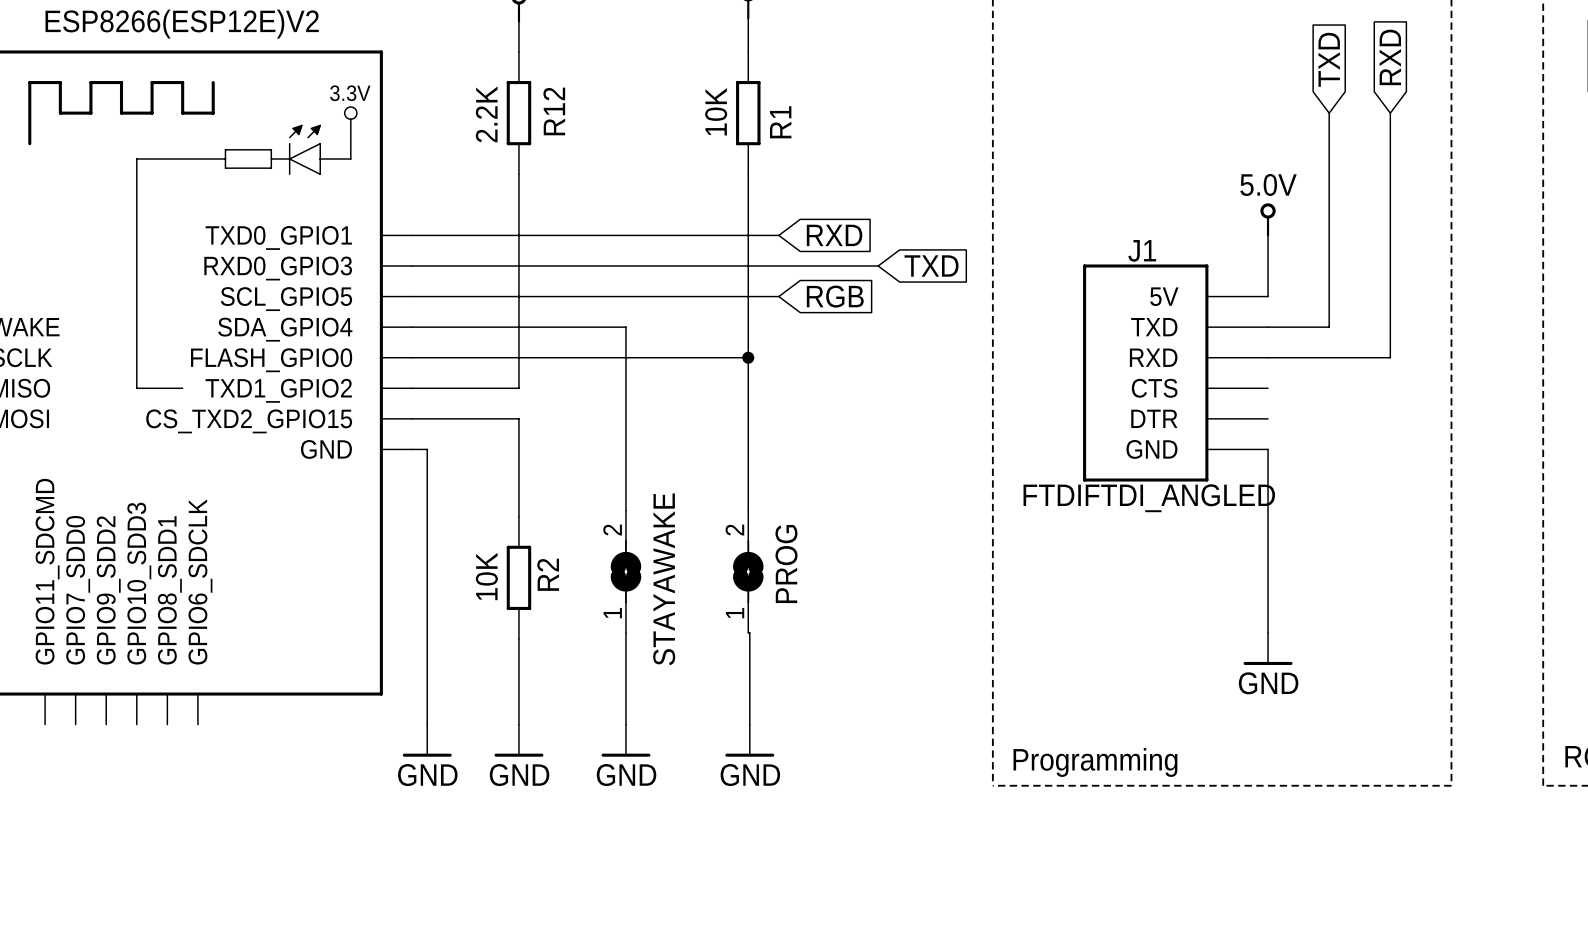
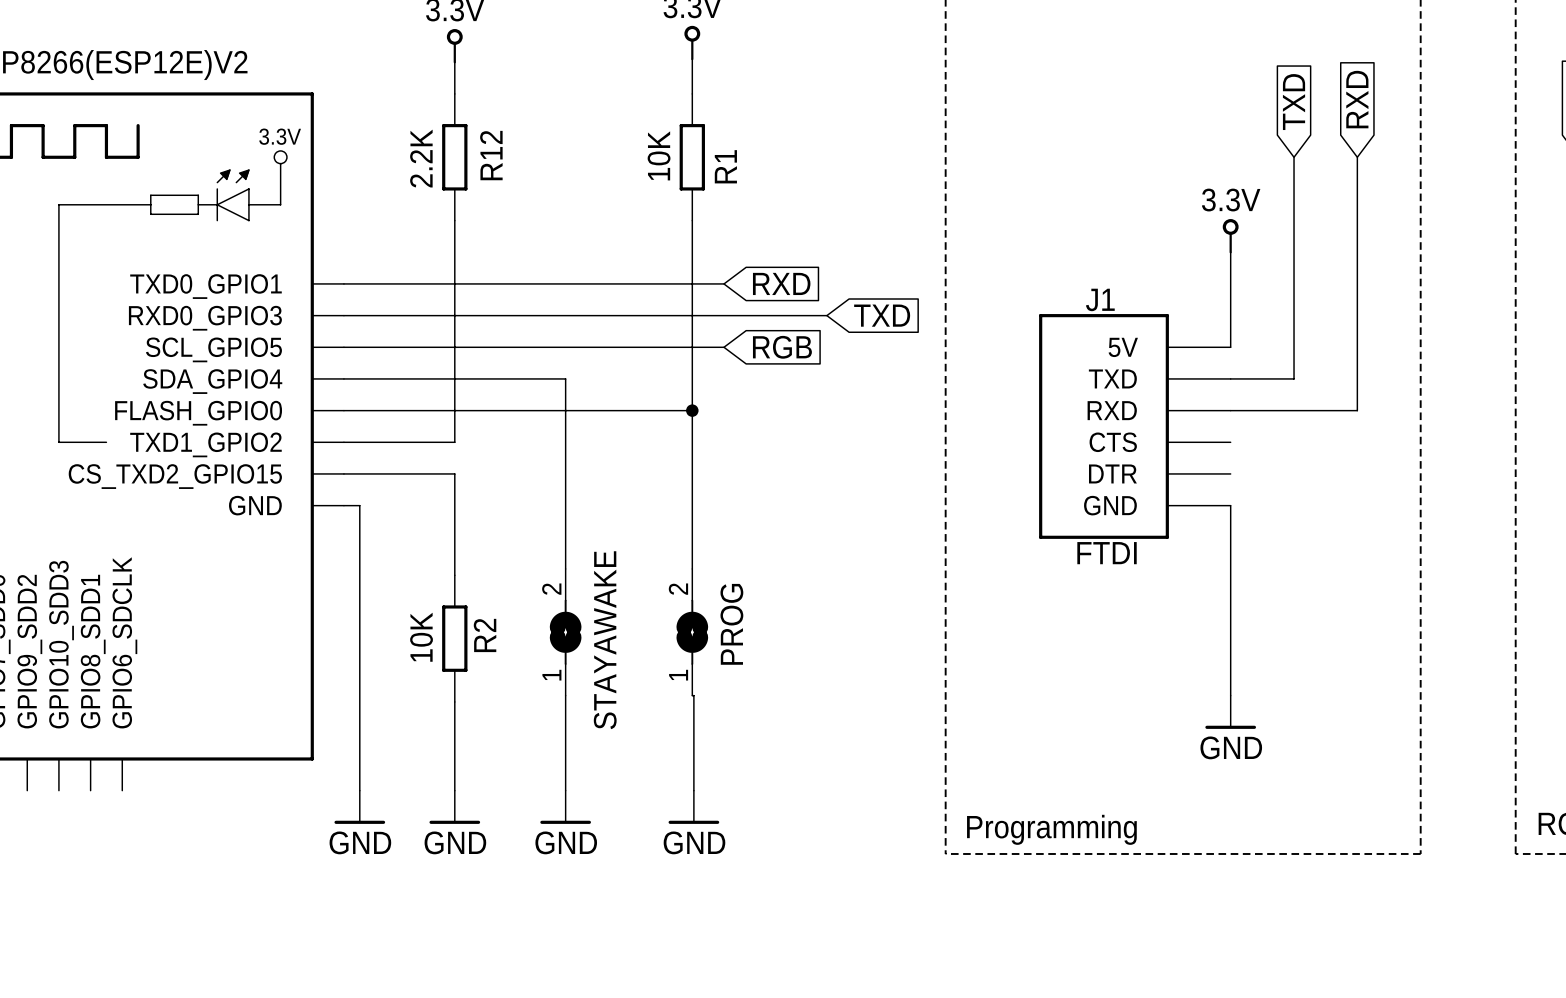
power symbol: none -> 3.3V (1230, 236)
power symbol: 5.0V (1268, 219) -> none
J1 value: FTDIFTDI_ANGLED (1149, 498) -> FTDI (1107, 553)

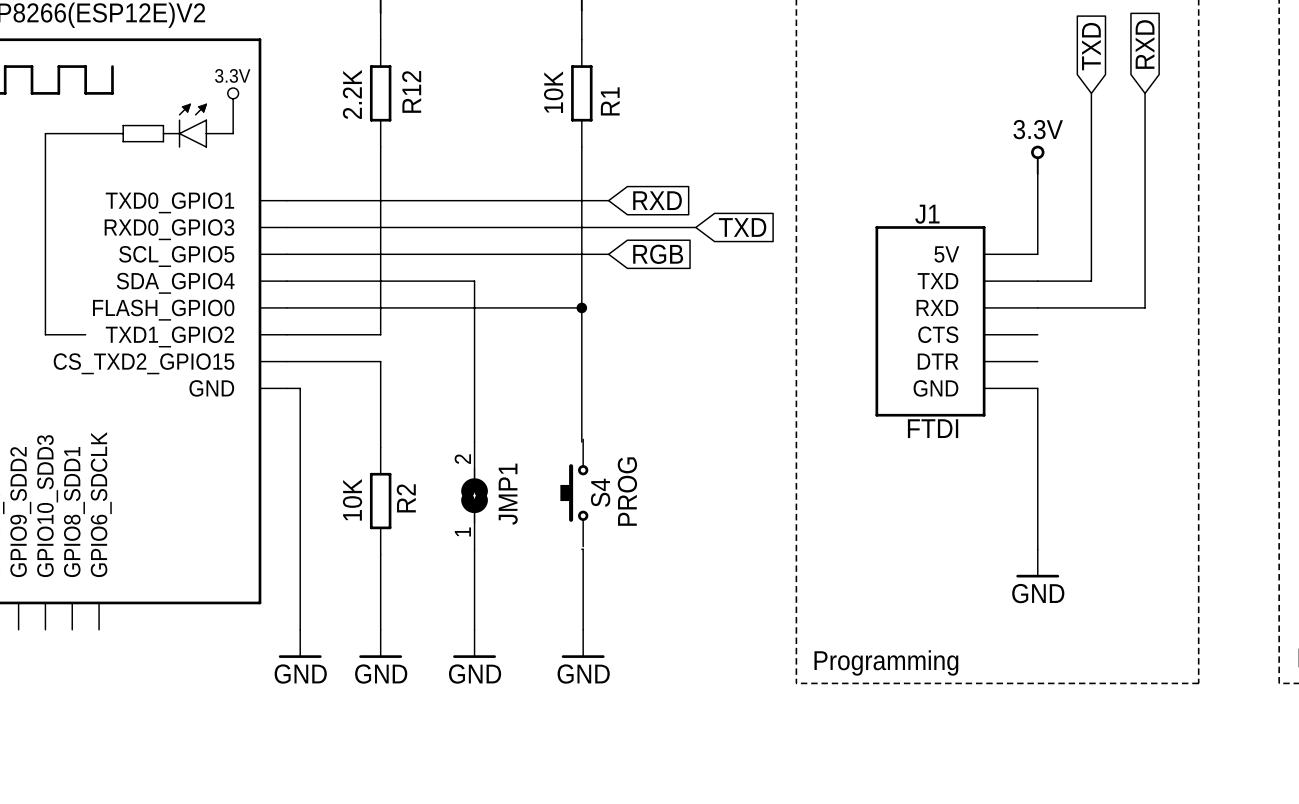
S4: none -> PROG (574, 493)
PROG: (692, 632) -> none
STAYAWAKE name: STAYAWAKE (605, 640) -> JMP1 (508, 494)

